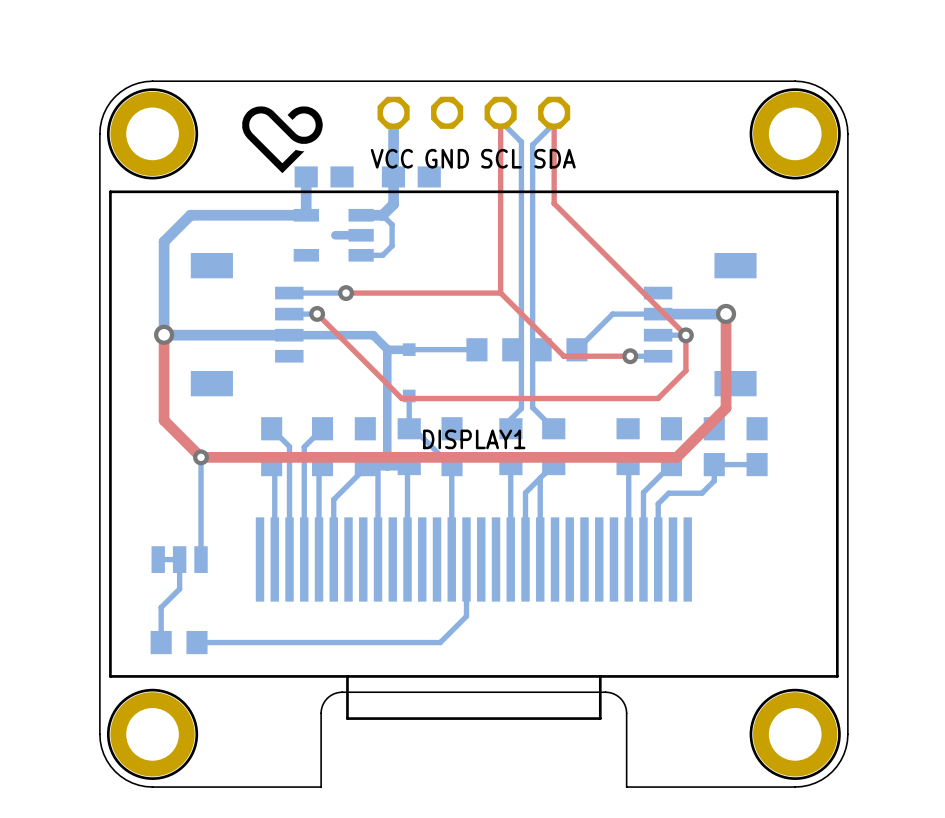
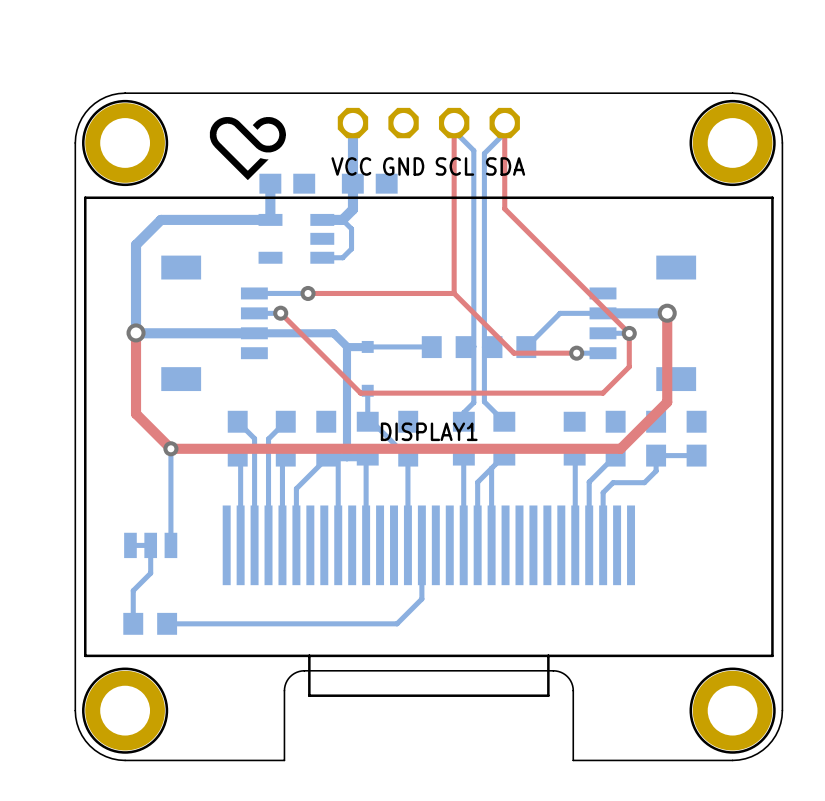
bottom track: (335, 235) (361, 235) -> none

